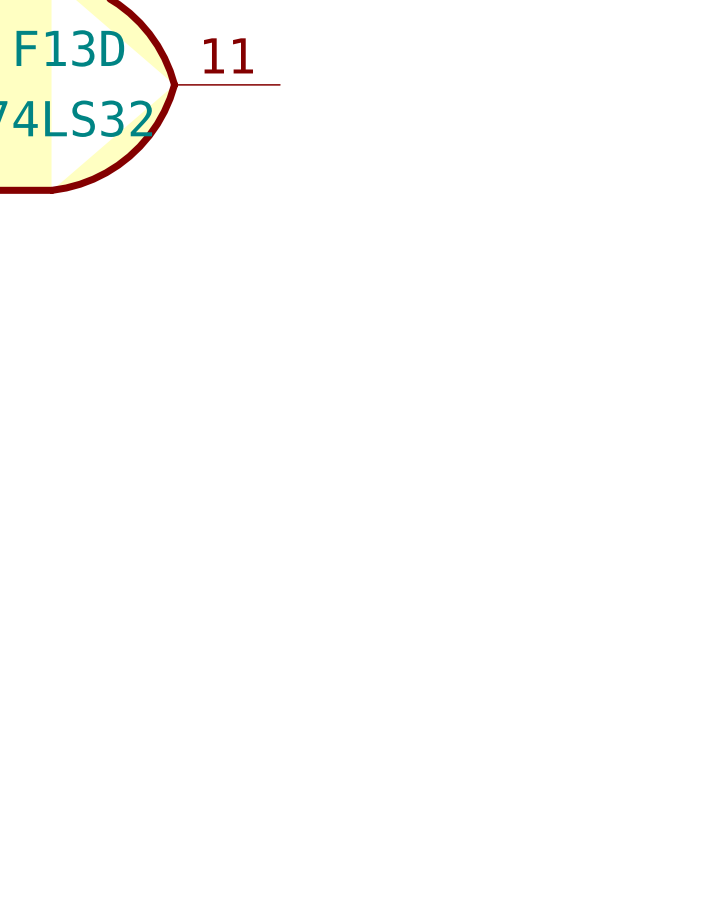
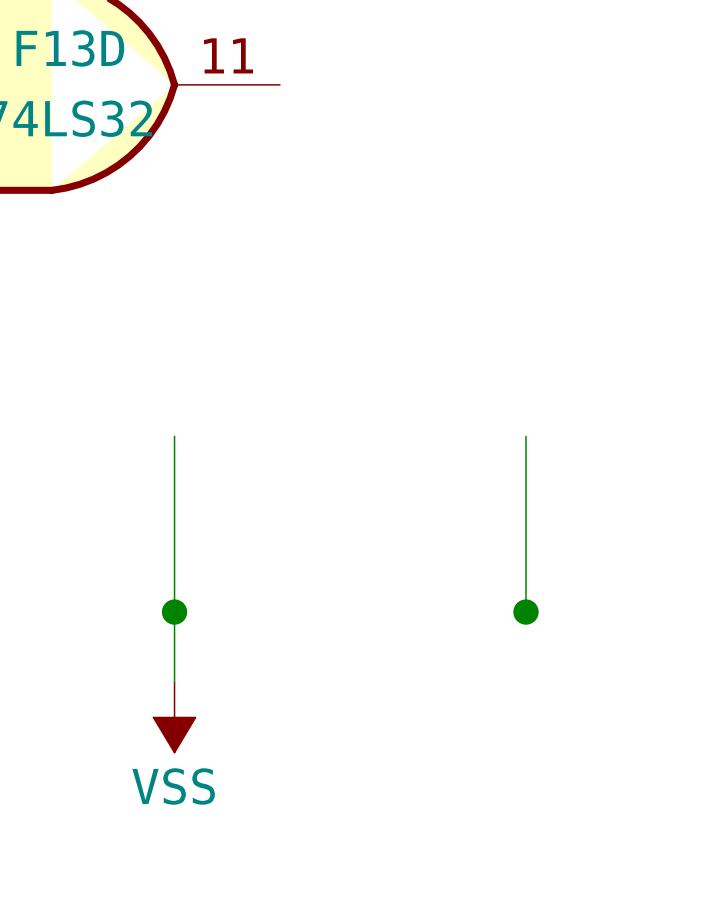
wire: none -> (174, 436) (174, 682)
wire: none -> (525, 436) (525, 612)
junction: none -> (174, 612)
junction: none -> (525, 612)
power symbol: none -> VSS (174, 717)

